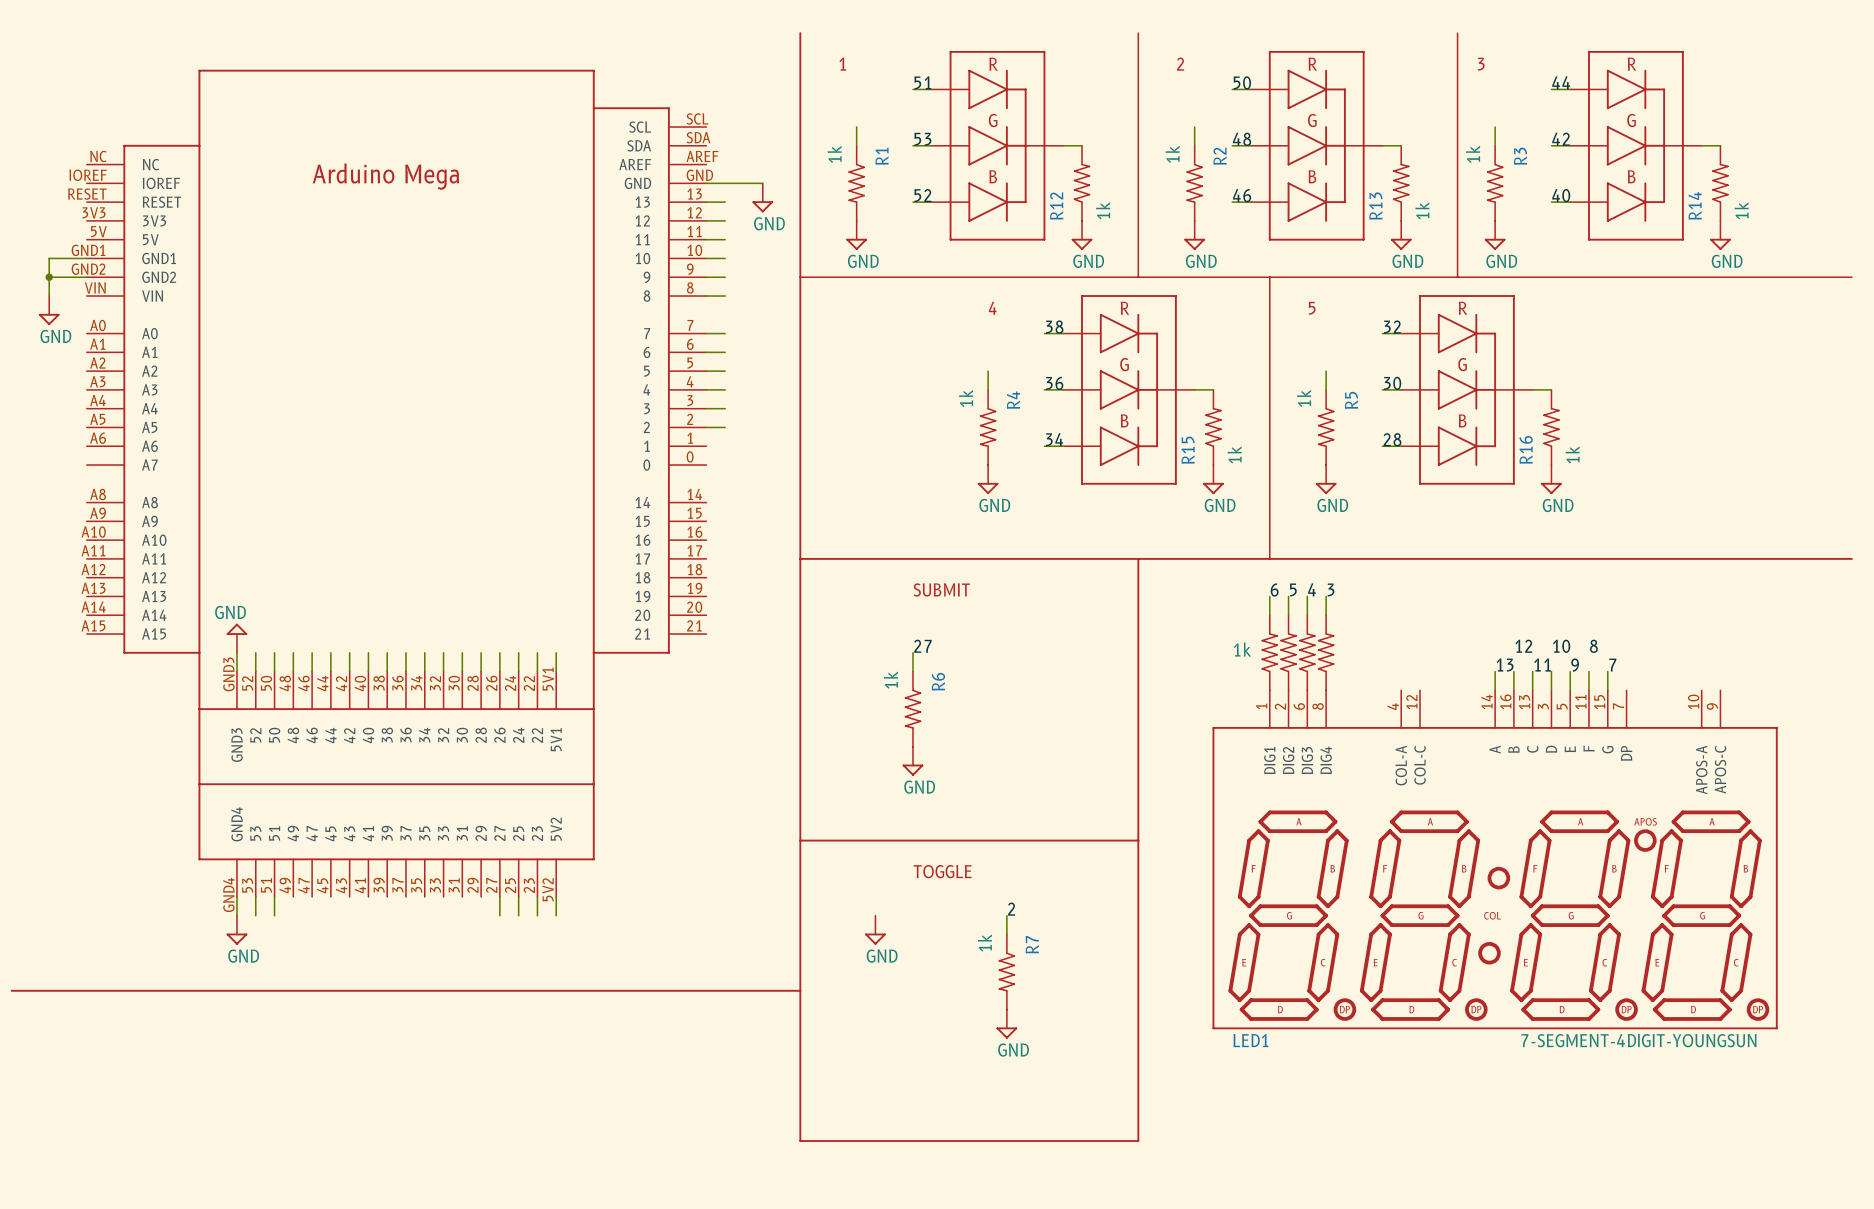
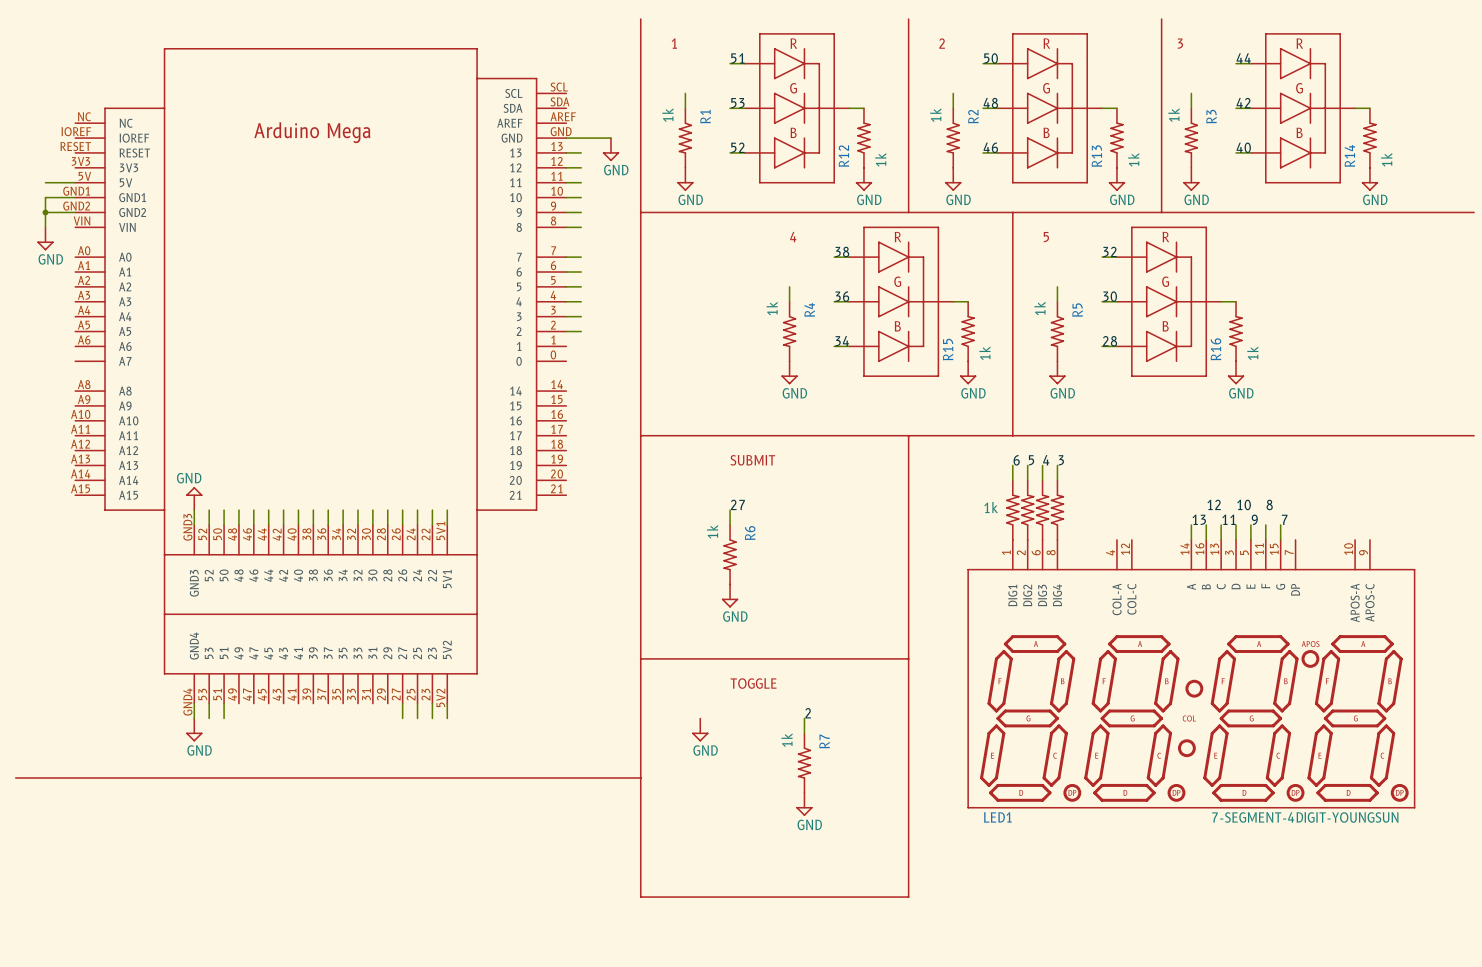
wire: none -> (45, 182) (75, 182)

